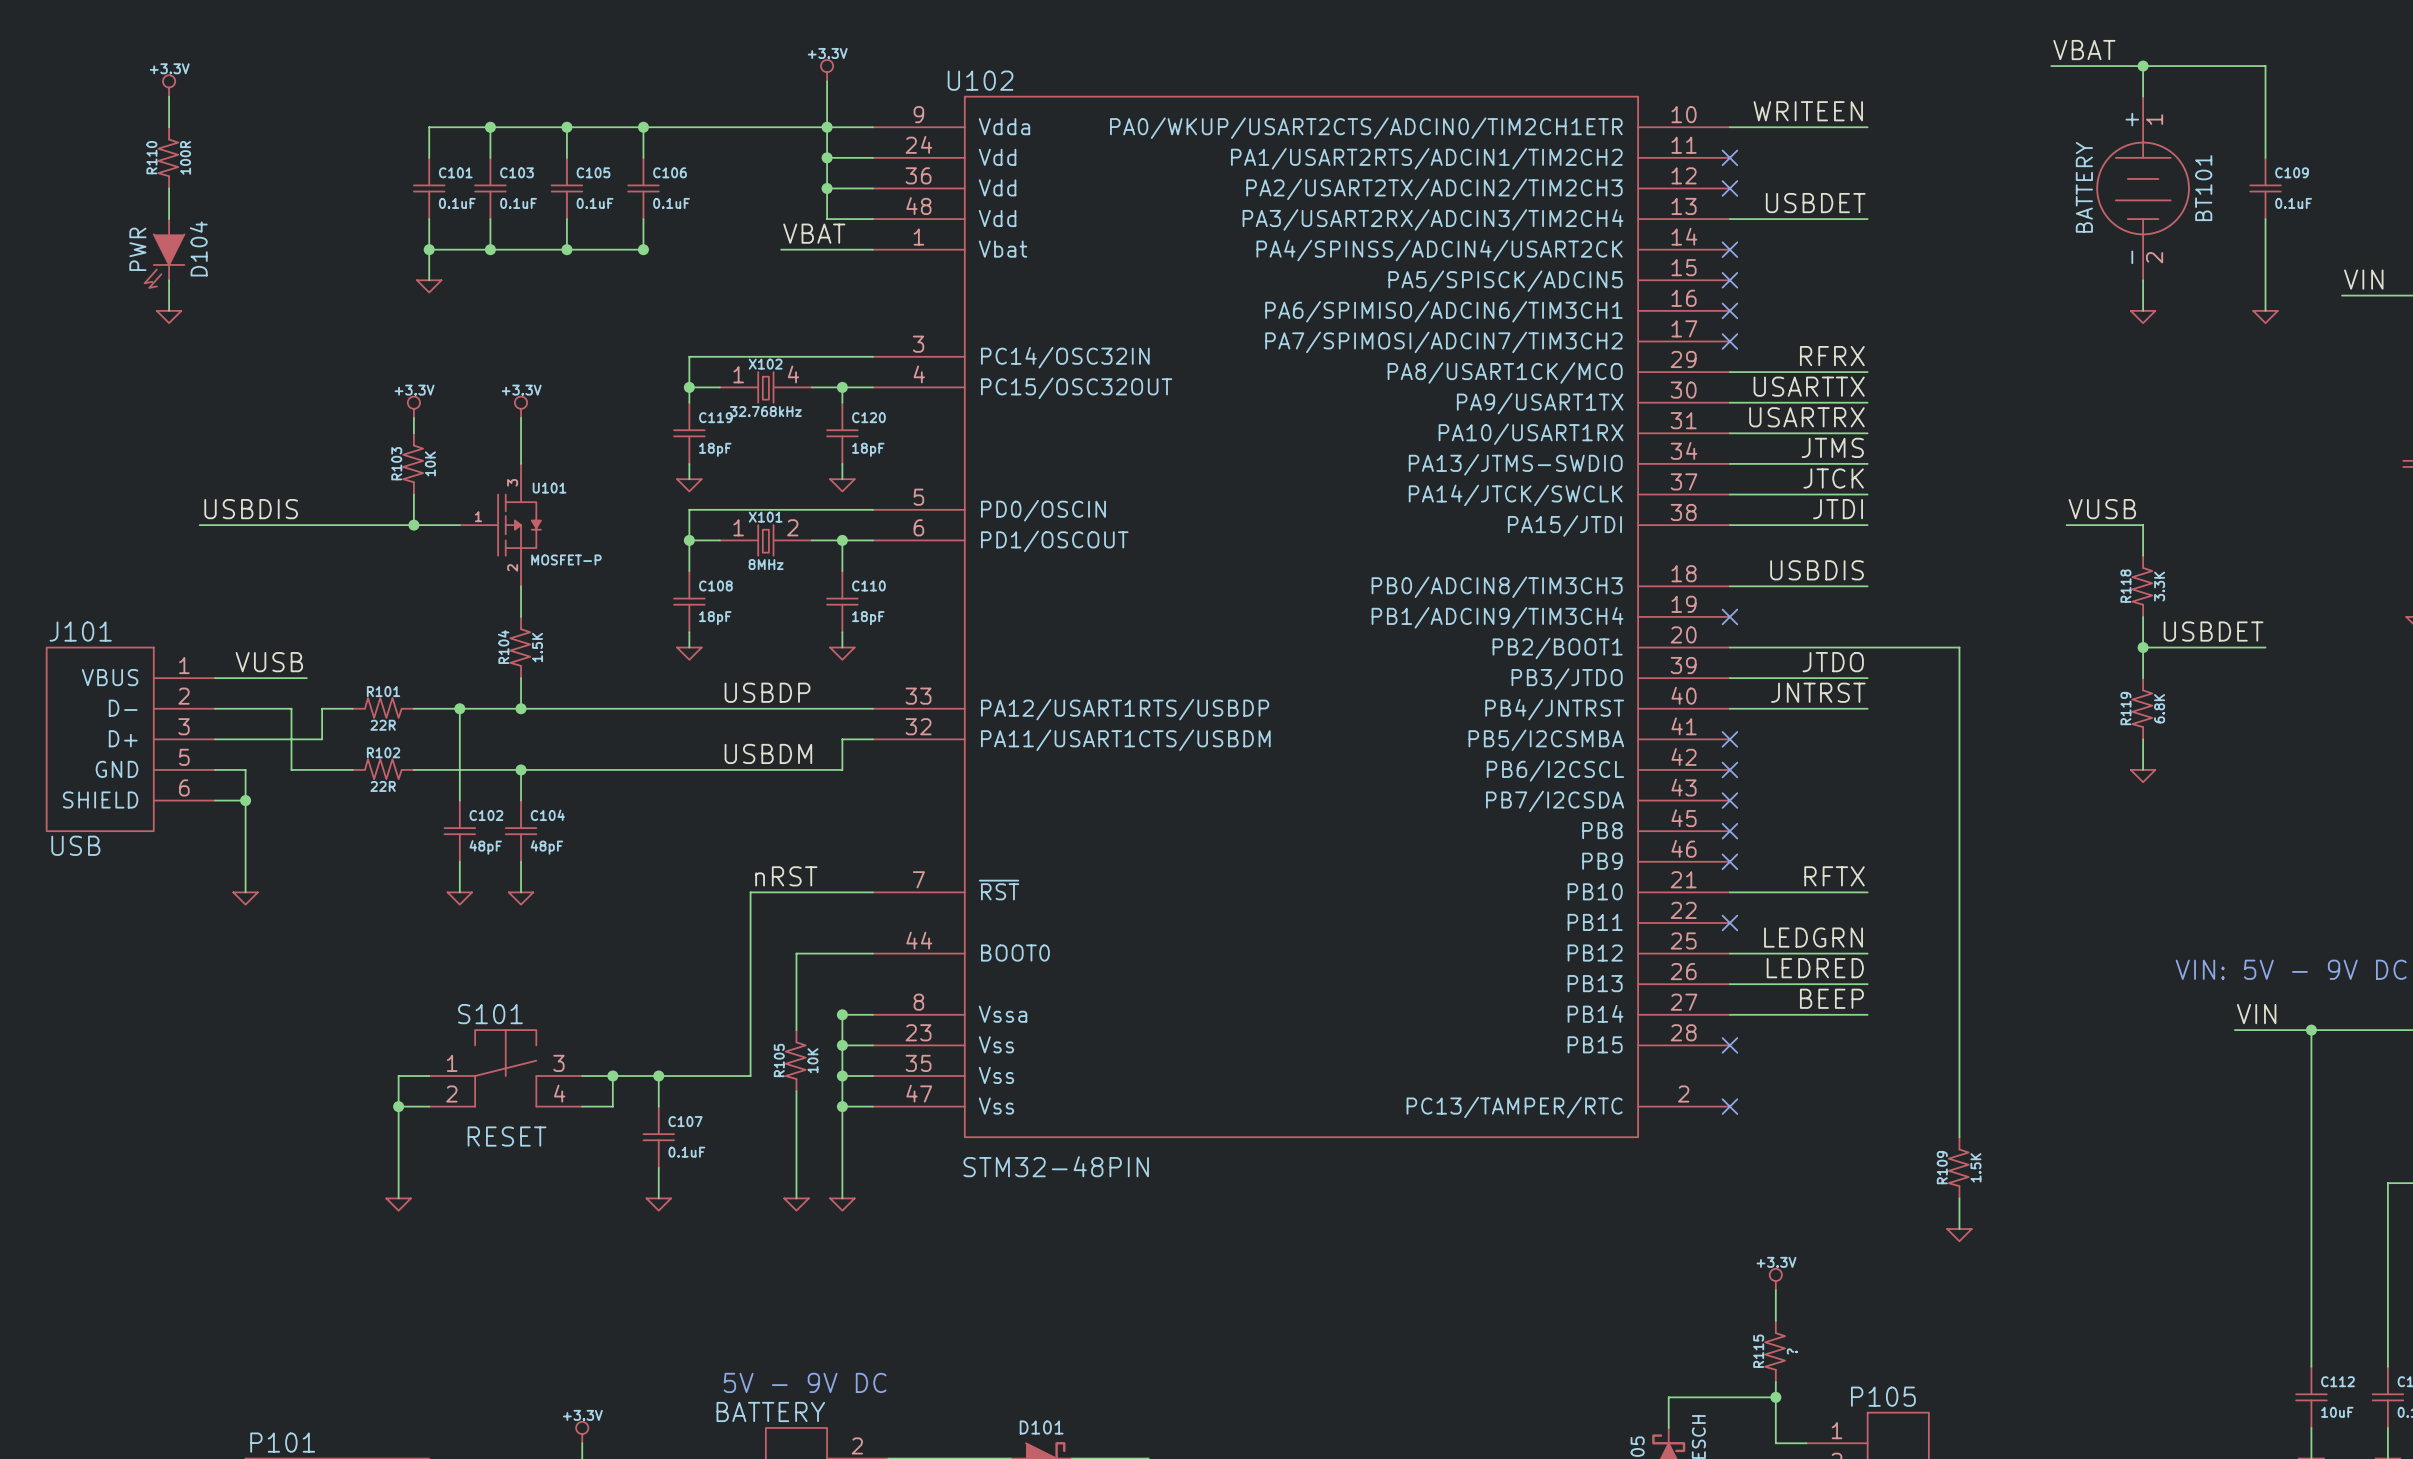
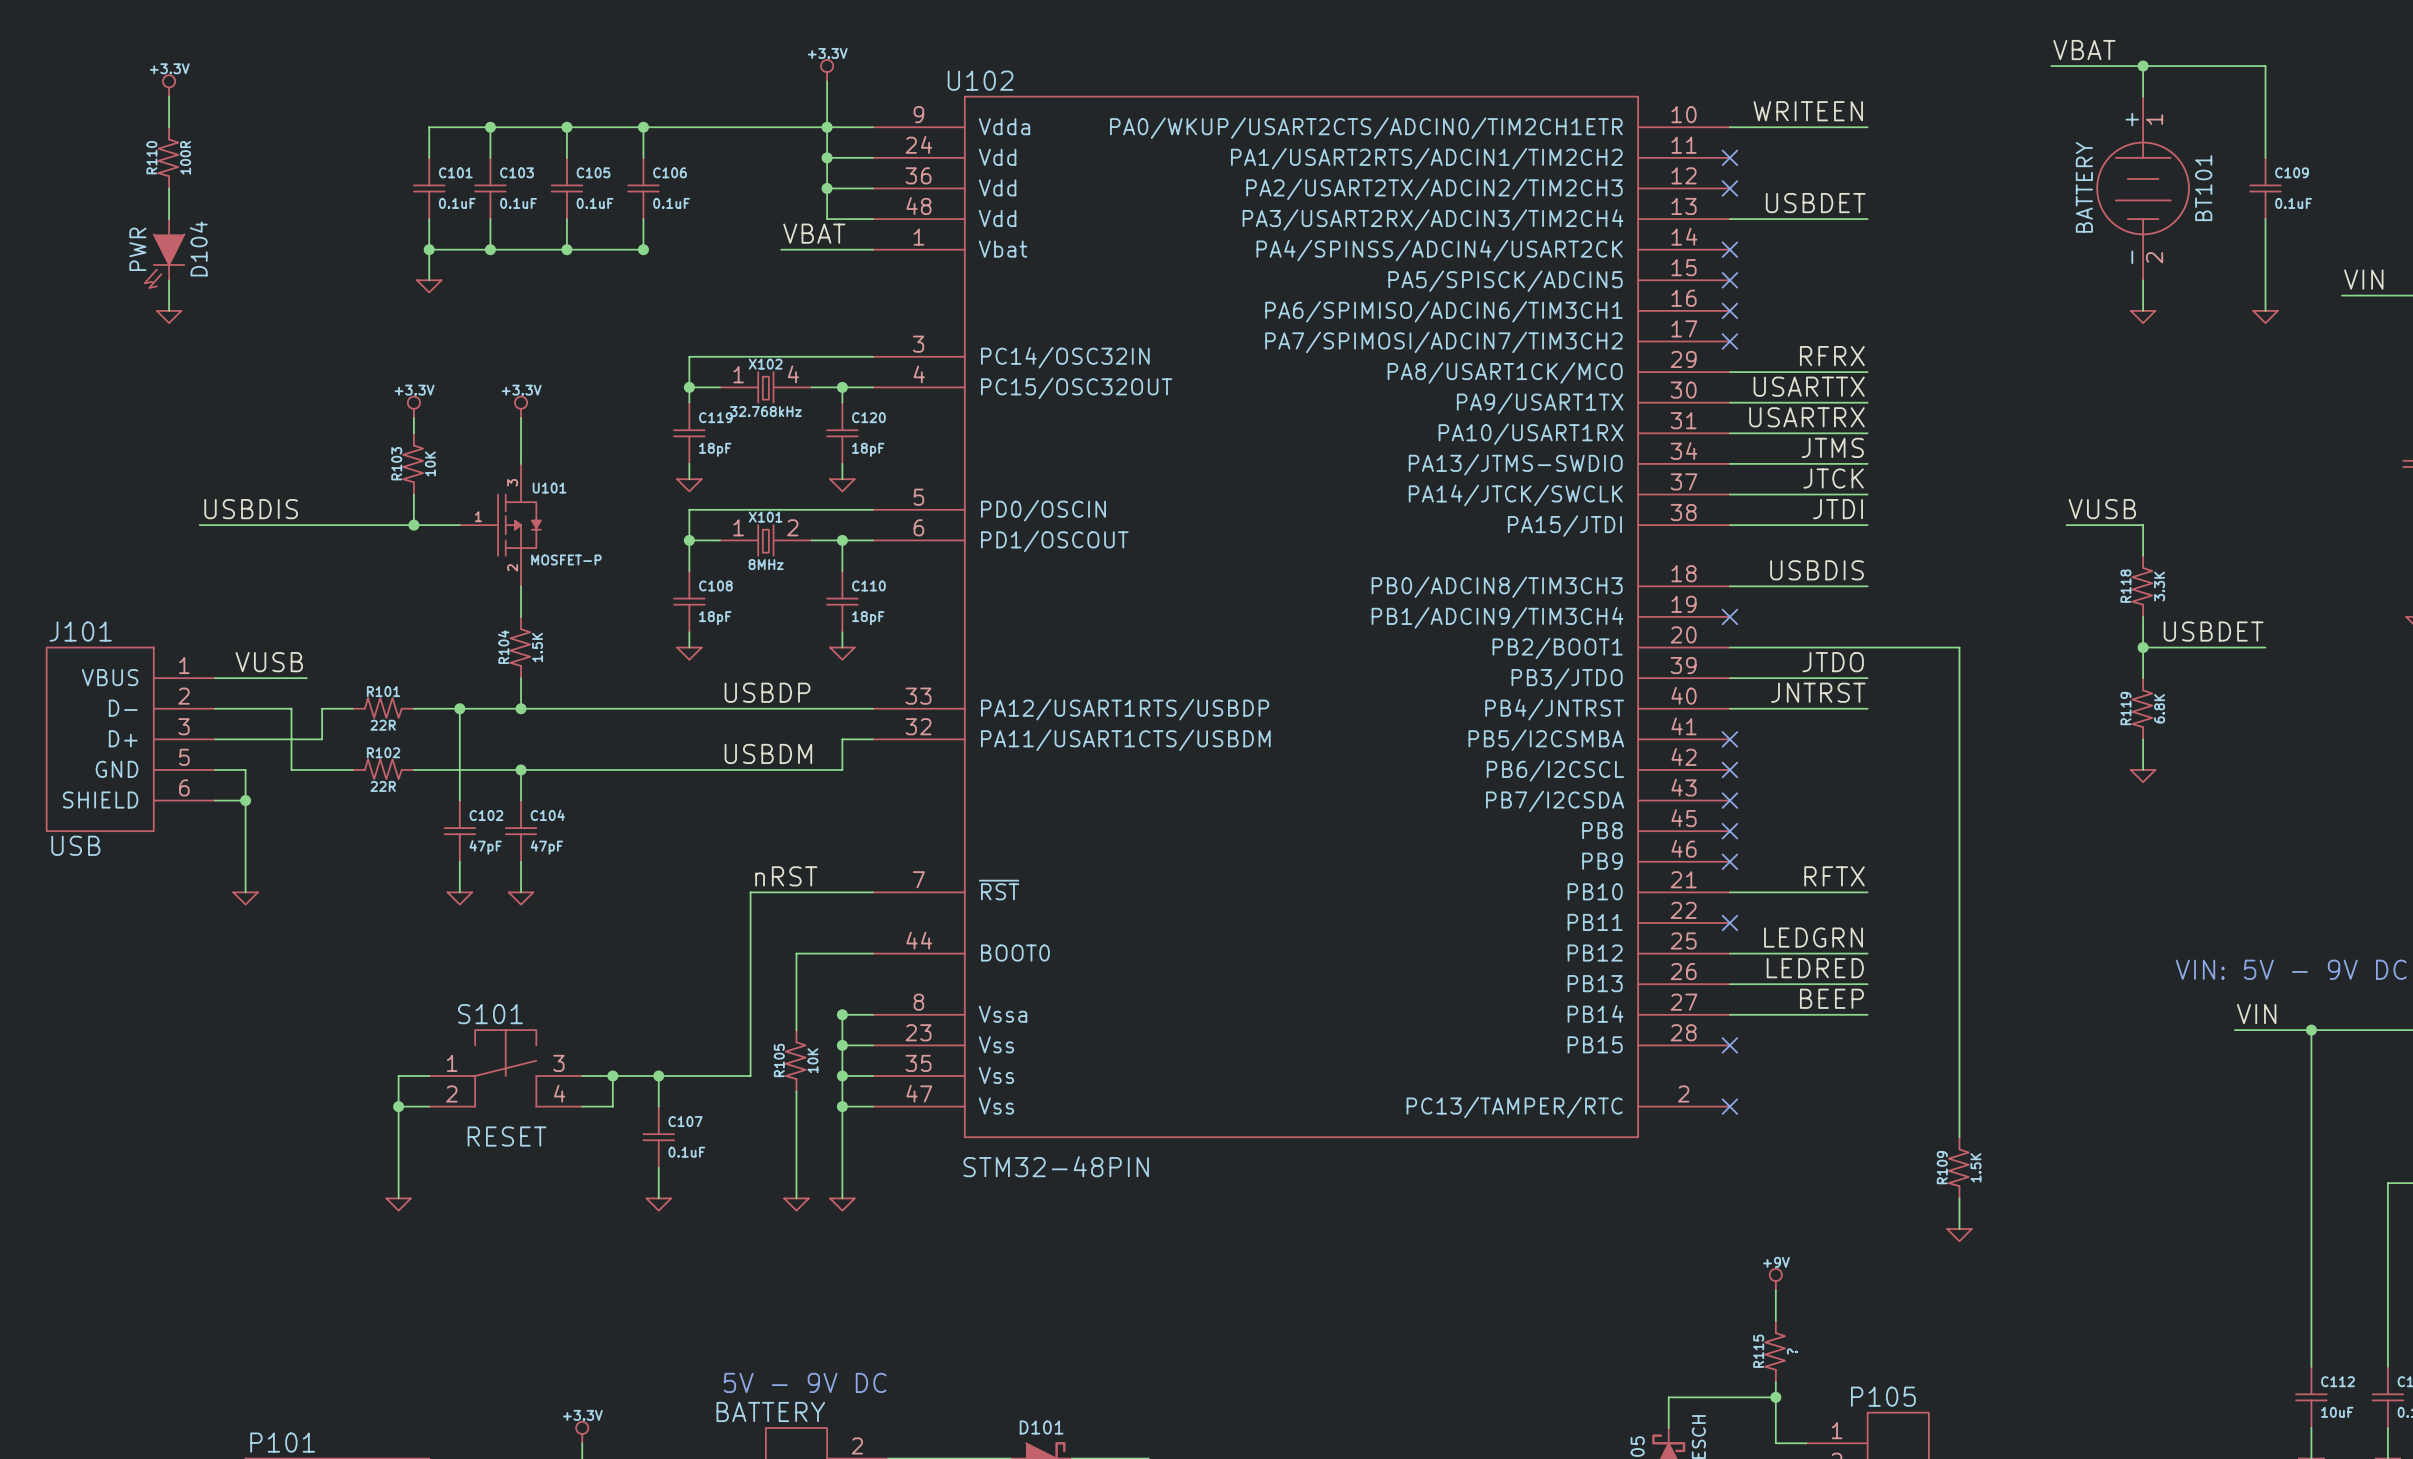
C102 value: 48pF (485, 847) -> 47pF (485, 847)
C104 value: 48pF (546, 847) -> 47pF (546, 847)
power symbol: +3.3V (1775, 1279) -> +9V (1775, 1279)

